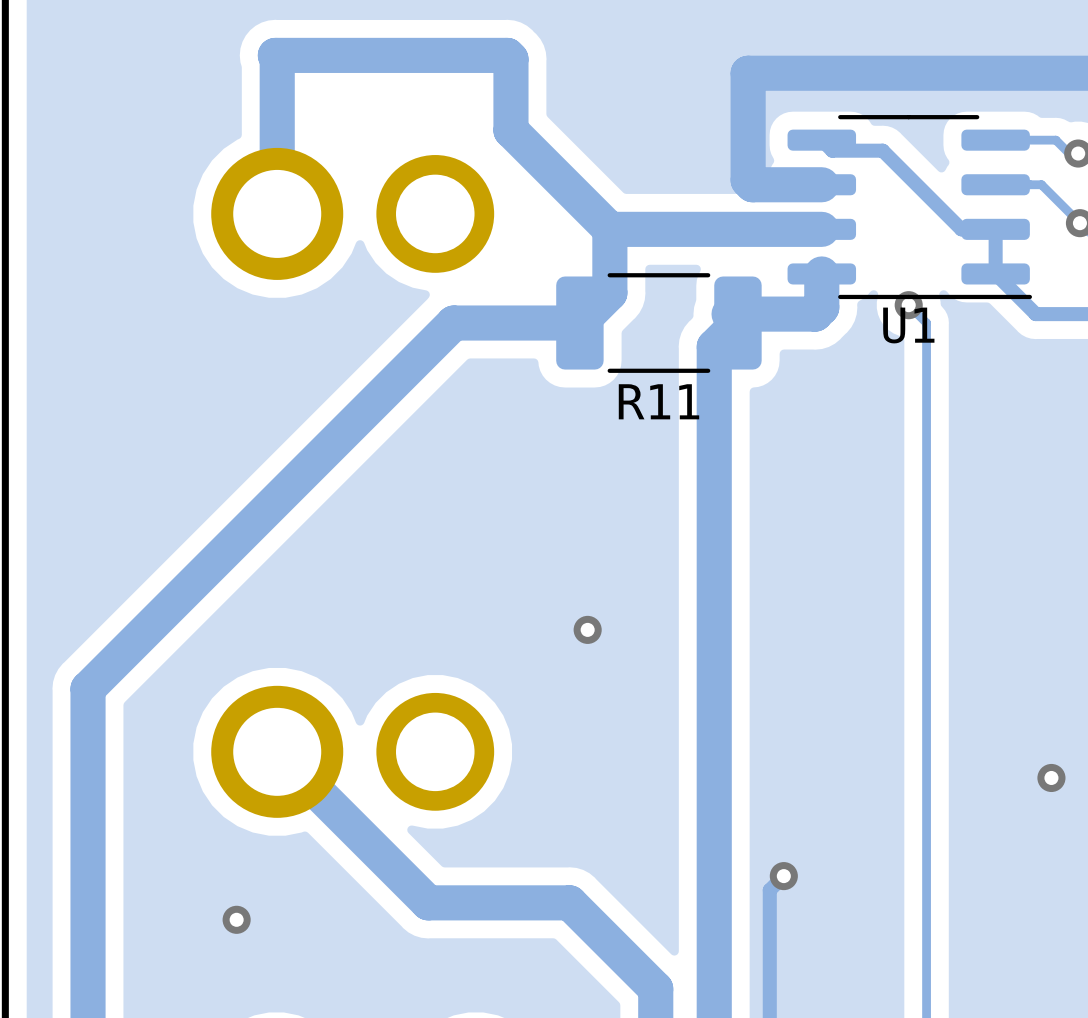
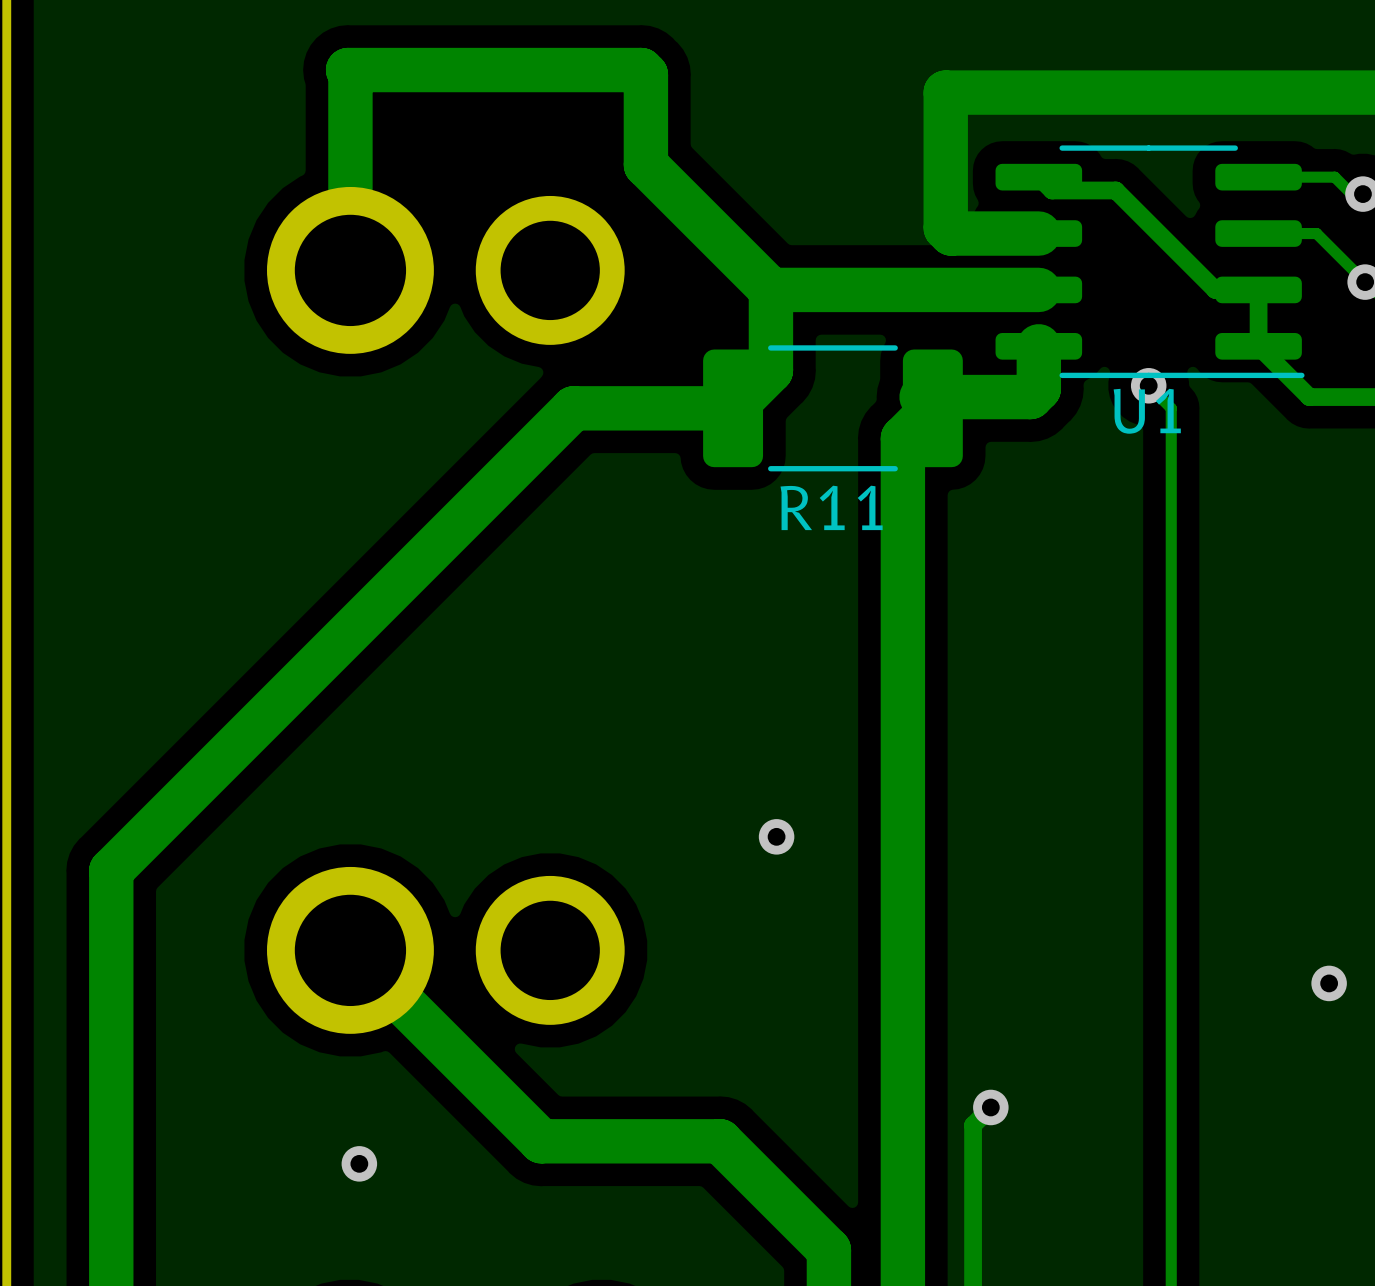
via position: (587, 629) -> (776, 836)
via position: (236, 919) -> (359, 1163)

